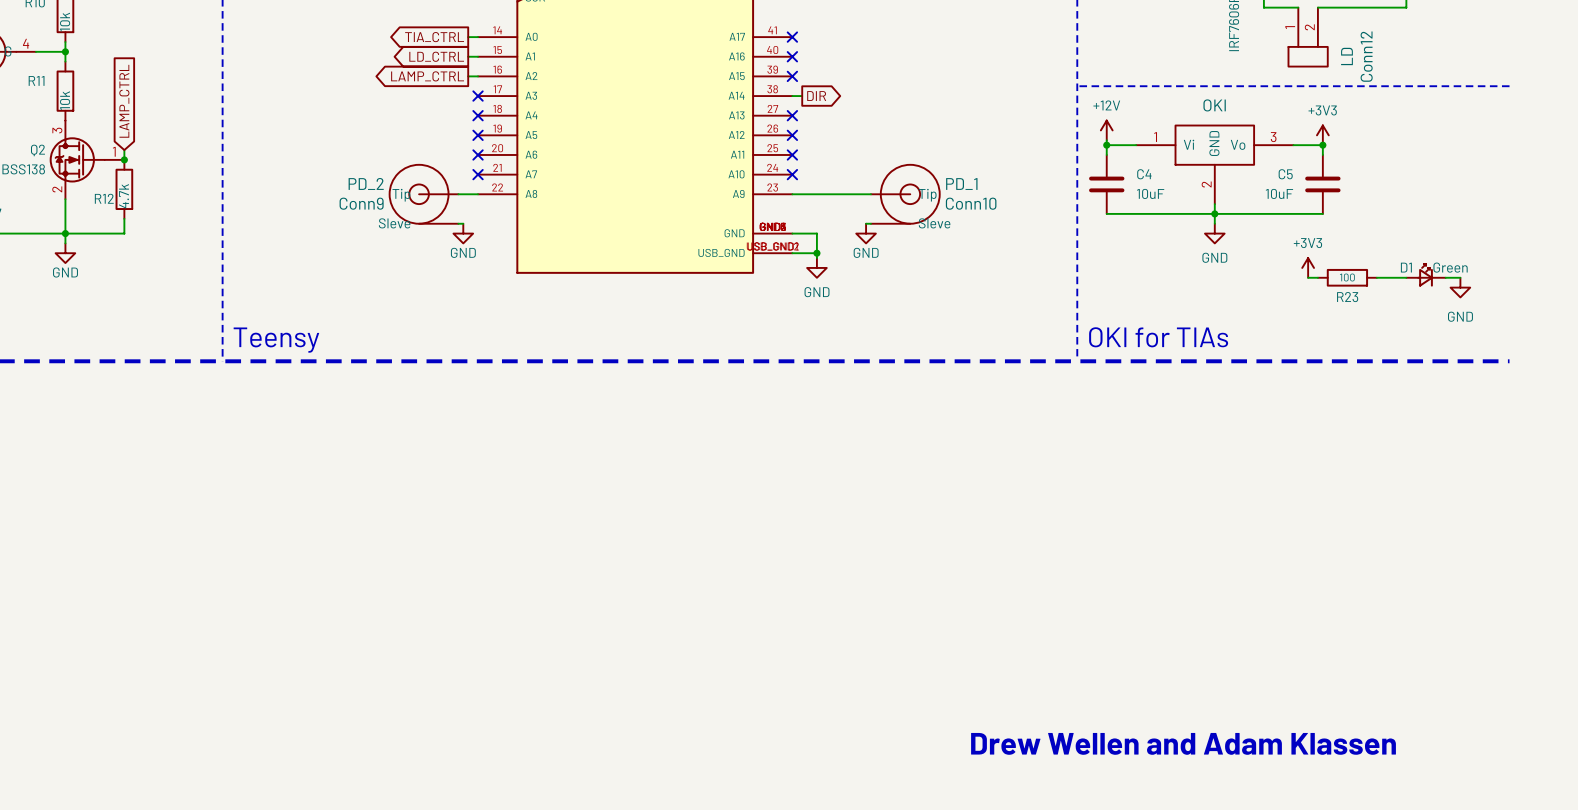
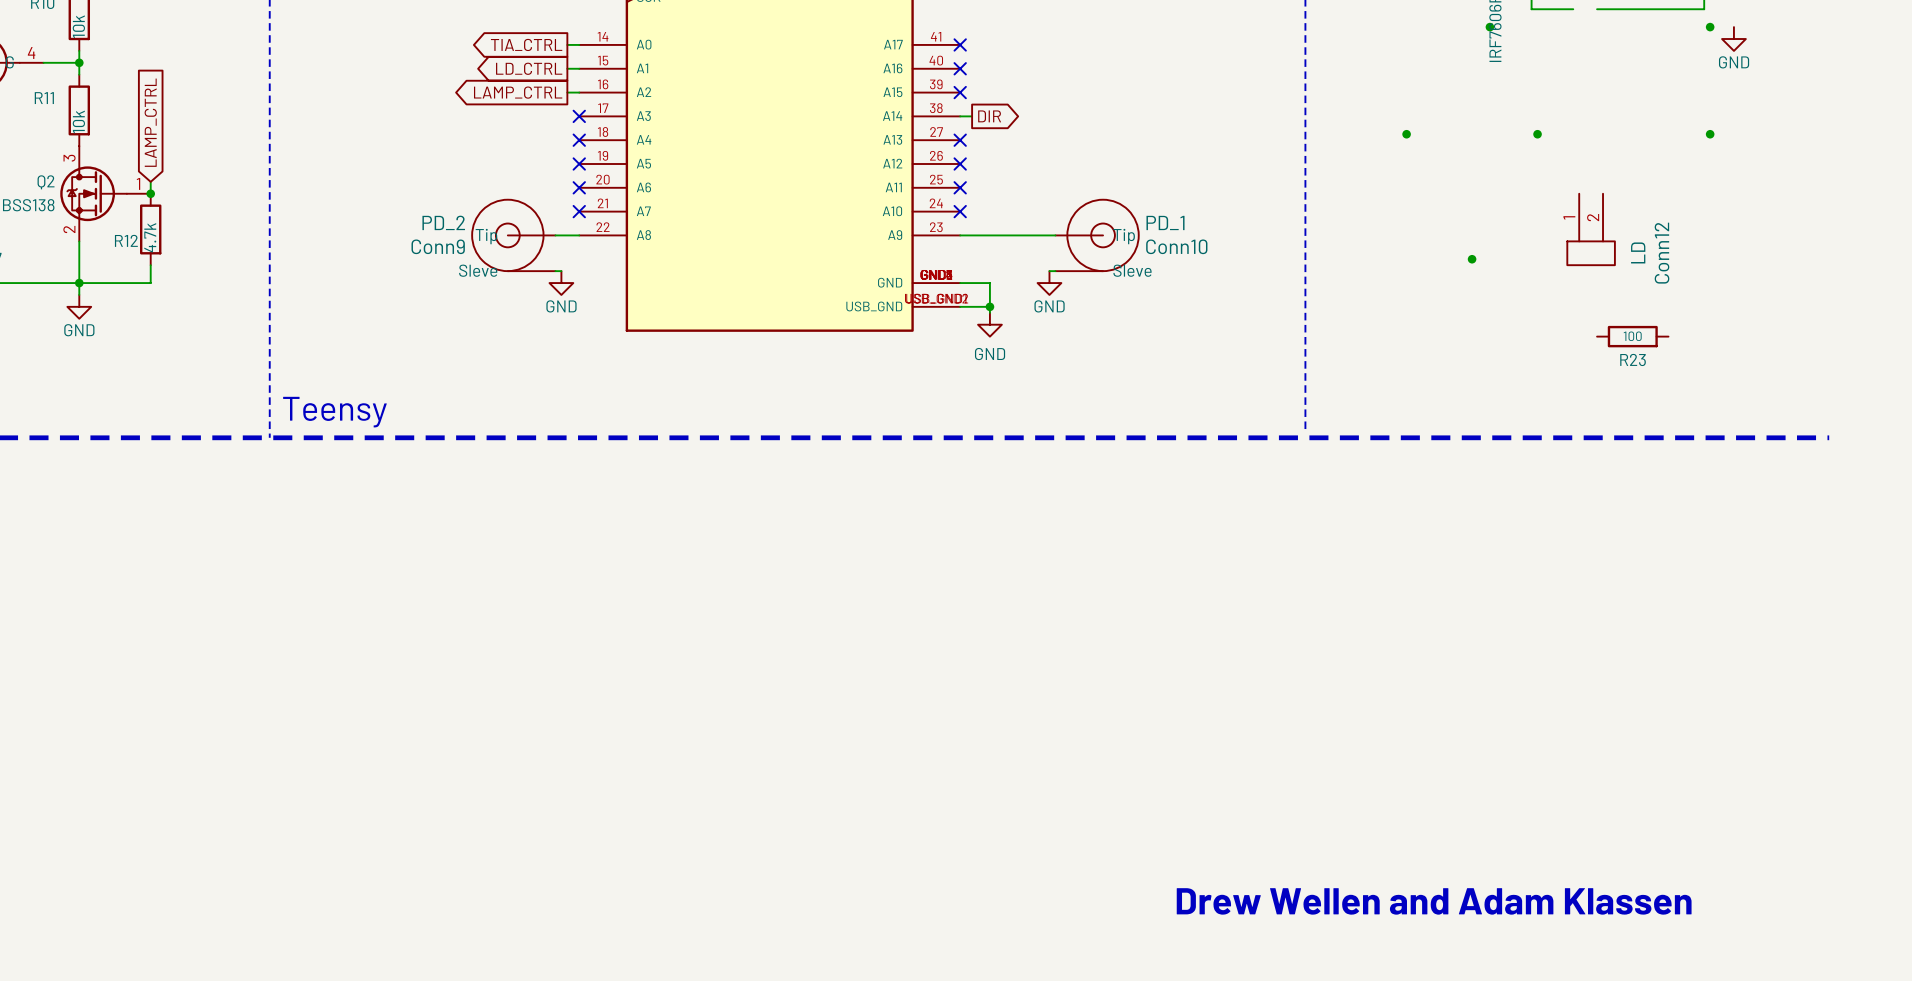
junction: none -> (1489, 27)
junction: none -> (1710, 27)
power symbol: none -> GND (1733, 39)
Conn12 position: (1308, 37) -> (1591, 229)
line: (1077, 86) (1509, 86) -> none
junction: none -> (1406, 134)
junction: none -> (1537, 134)
junction: none -> (1710, 134)
power symbol: +12V (1106, 130) -> none
power symbol: +3V3 (1322, 135) -> none
wire: (1106, 140) (1106, 154) -> none
wire: (1106, 145) (1136, 145) -> none
junction: (1106, 145) -> none
wire: (1293, 145) (1322, 145) (1322, 154) -> none
junction: (1322, 145) -> none
part: OKI (1214, 164) -> none
C4: 10uF (1106, 184) -> none
C5: 10uF (1322, 184) -> none
wire: (1214, 204) (1214, 223) -> none
wire: (1106, 213) (1322, 213) -> none
power symbol: GND (1214, 233) -> none
power symbol: +3V3 (1308, 267) -> none
D1: Green (1426, 275) -> none
wire: (1308, 277) (1317, 277) -> none
wire: (1376, 277) (1406, 277) -> none
wire: (1445, 277) (1460, 277) -> none
power symbol: GND (1460, 287) -> none
text: OKI for TIAs (1158, 337) -> none

